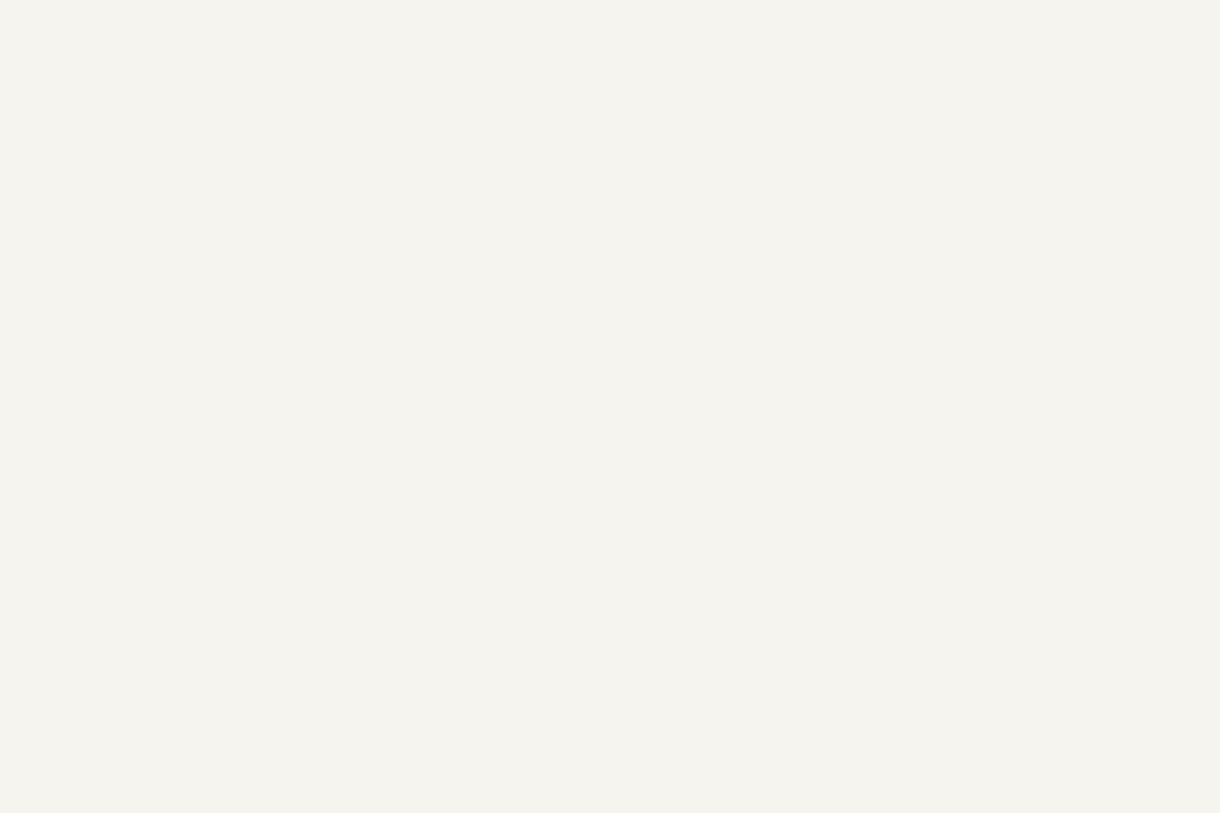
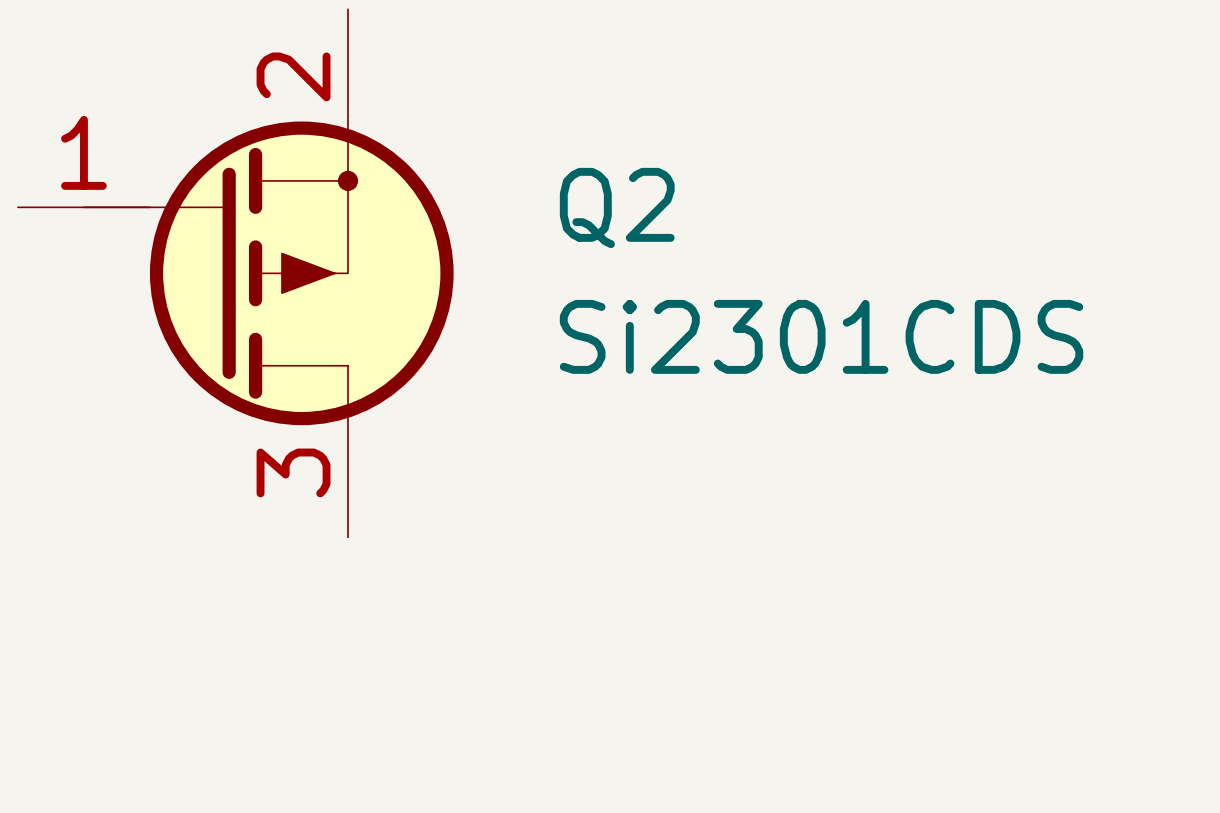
Q2: none -> Si2301CDS (235, 273)

